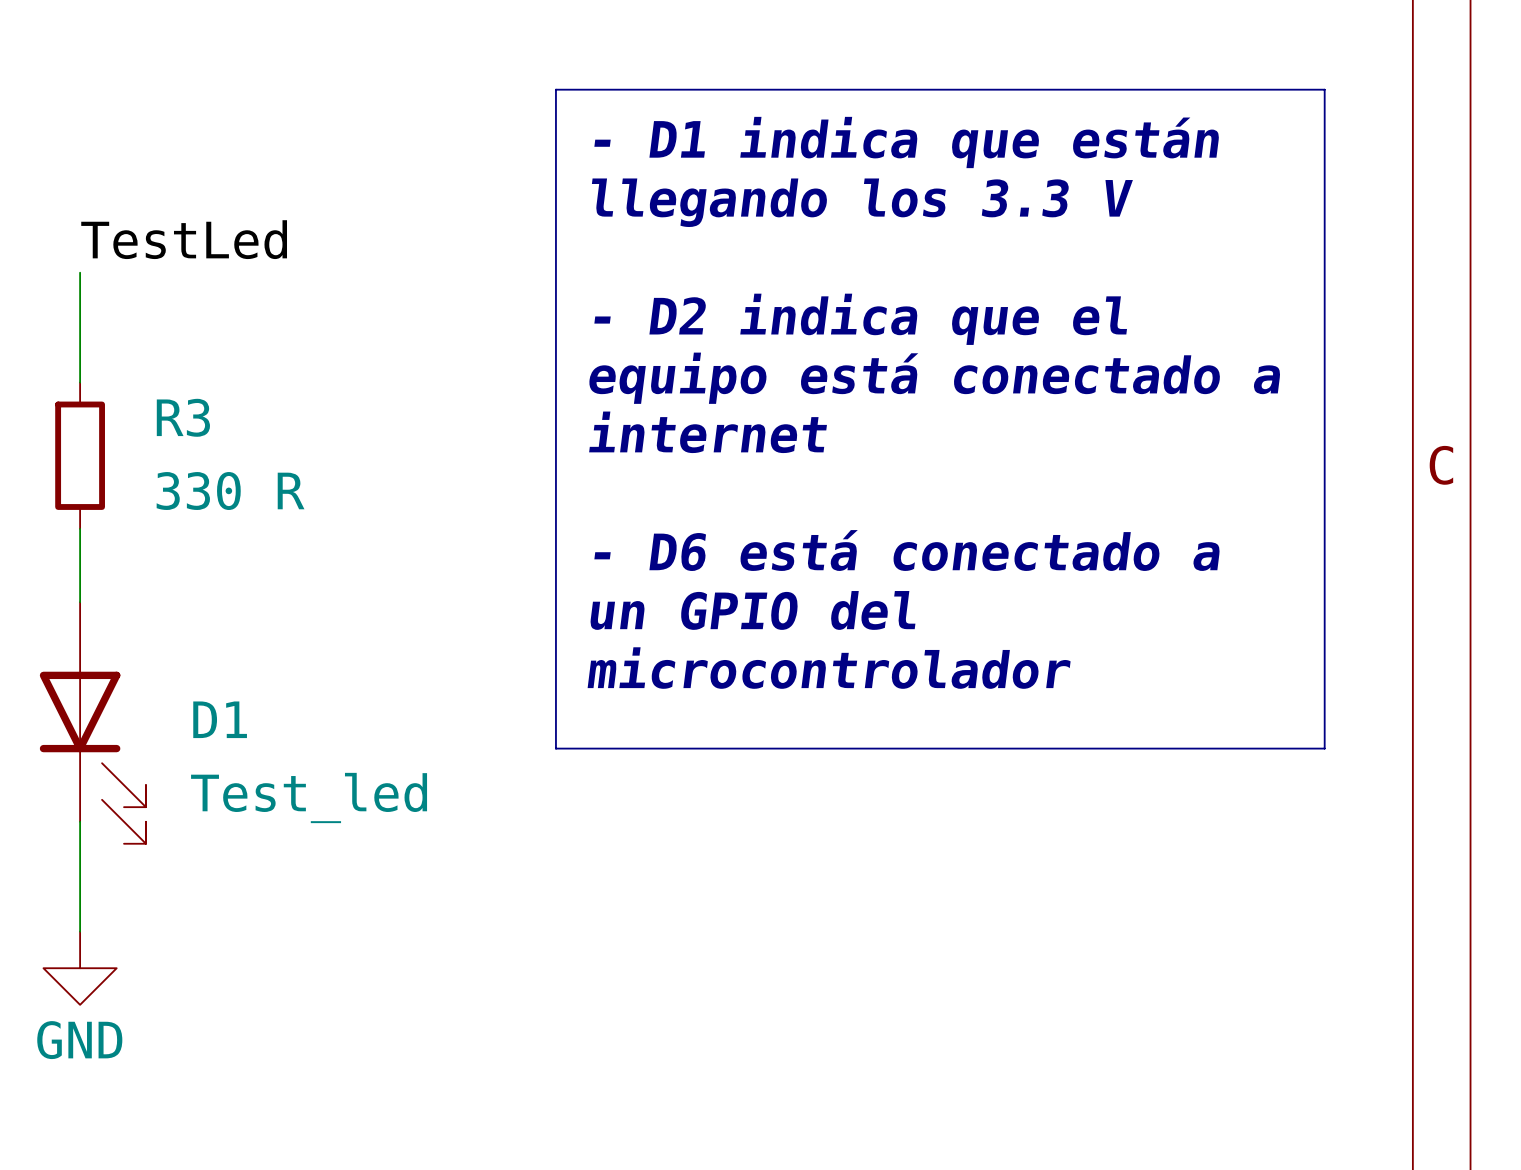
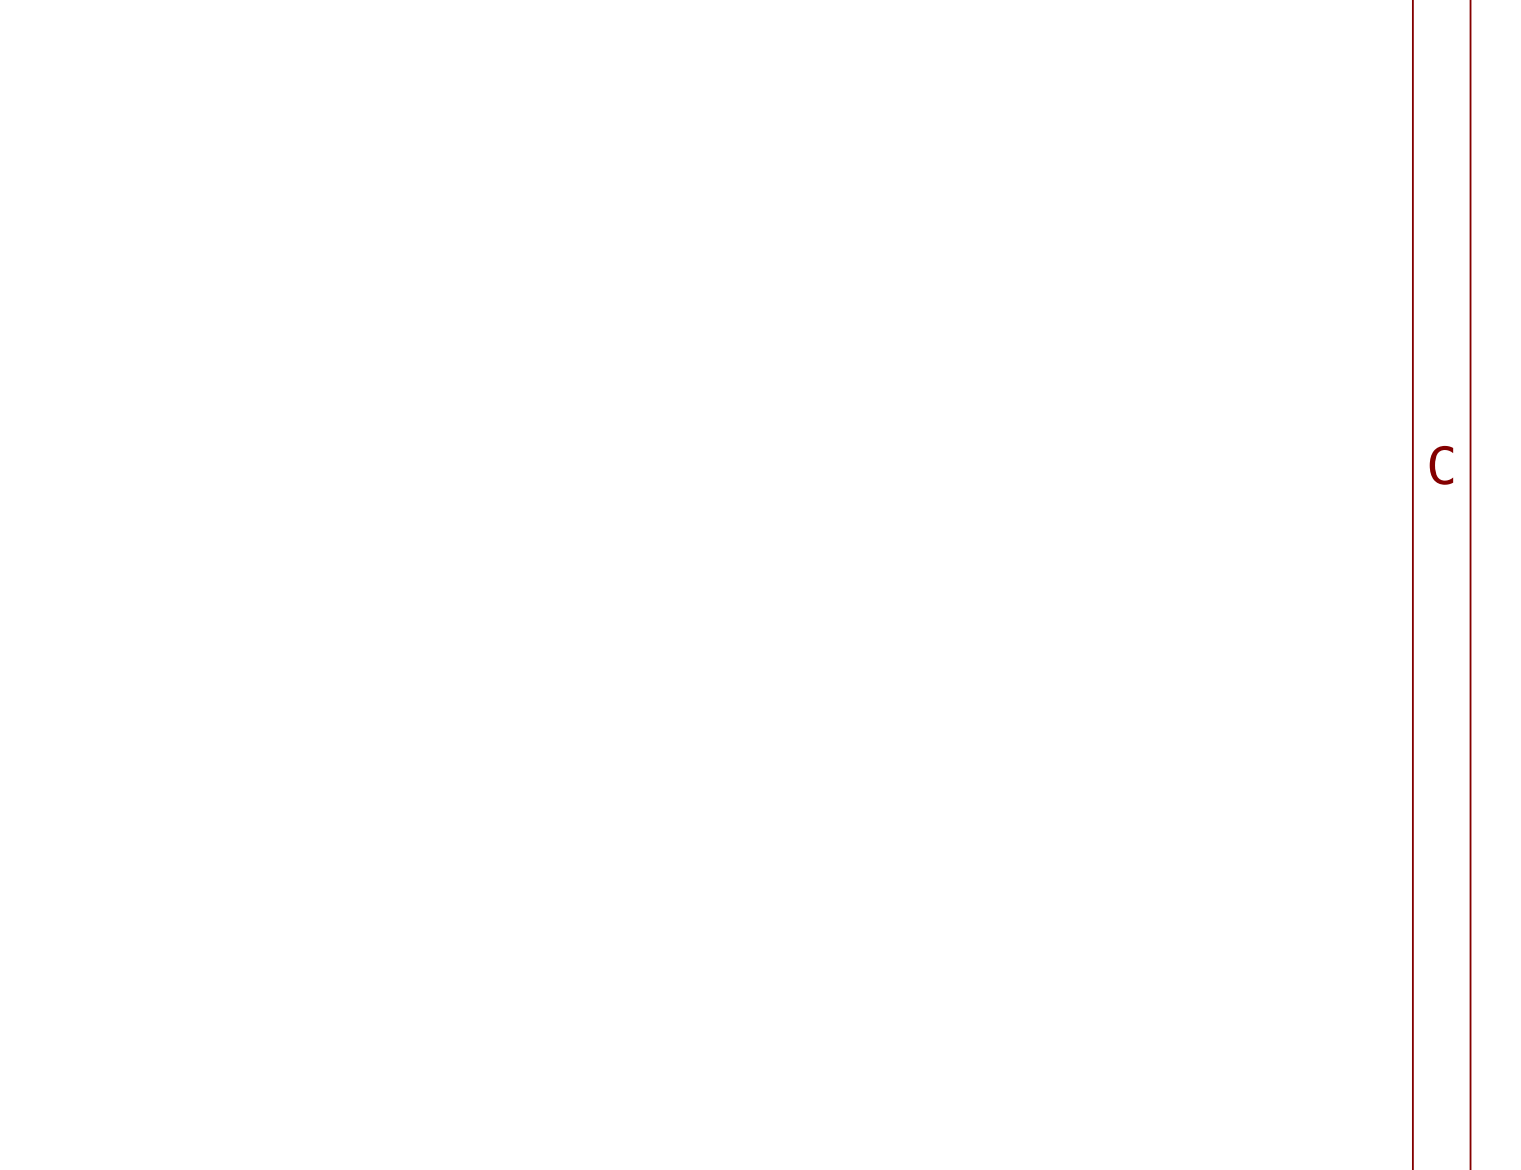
line: (555, 89) (1324, 89) (1324, 748) (555, 748) (555, 89) -> none
text: - D1 indica que están (906, 142) -> none
text: llegando los 3.3 V (862, 202) -> none
label: TestLed (184, 239) -> none
wire: (80, 272) (80, 382) -> none
text: - D2 indica que el (860, 319) -> none
text: equipo está conectado a (934, 378) -> none
text: internet (708, 432) -> none
R3: 330 R (80, 455) -> none
wire: (80, 528) (80, 602) -> none
text: - D6 está conectado a (907, 550) -> none
text: un GPIO del (752, 610) -> none
text: microcontrolador (829, 668) -> none
D1: Test_led (92, 722) -> none
wire: (80, 821) (80, 931) -> none
power symbol: GND (80, 968) -> none

